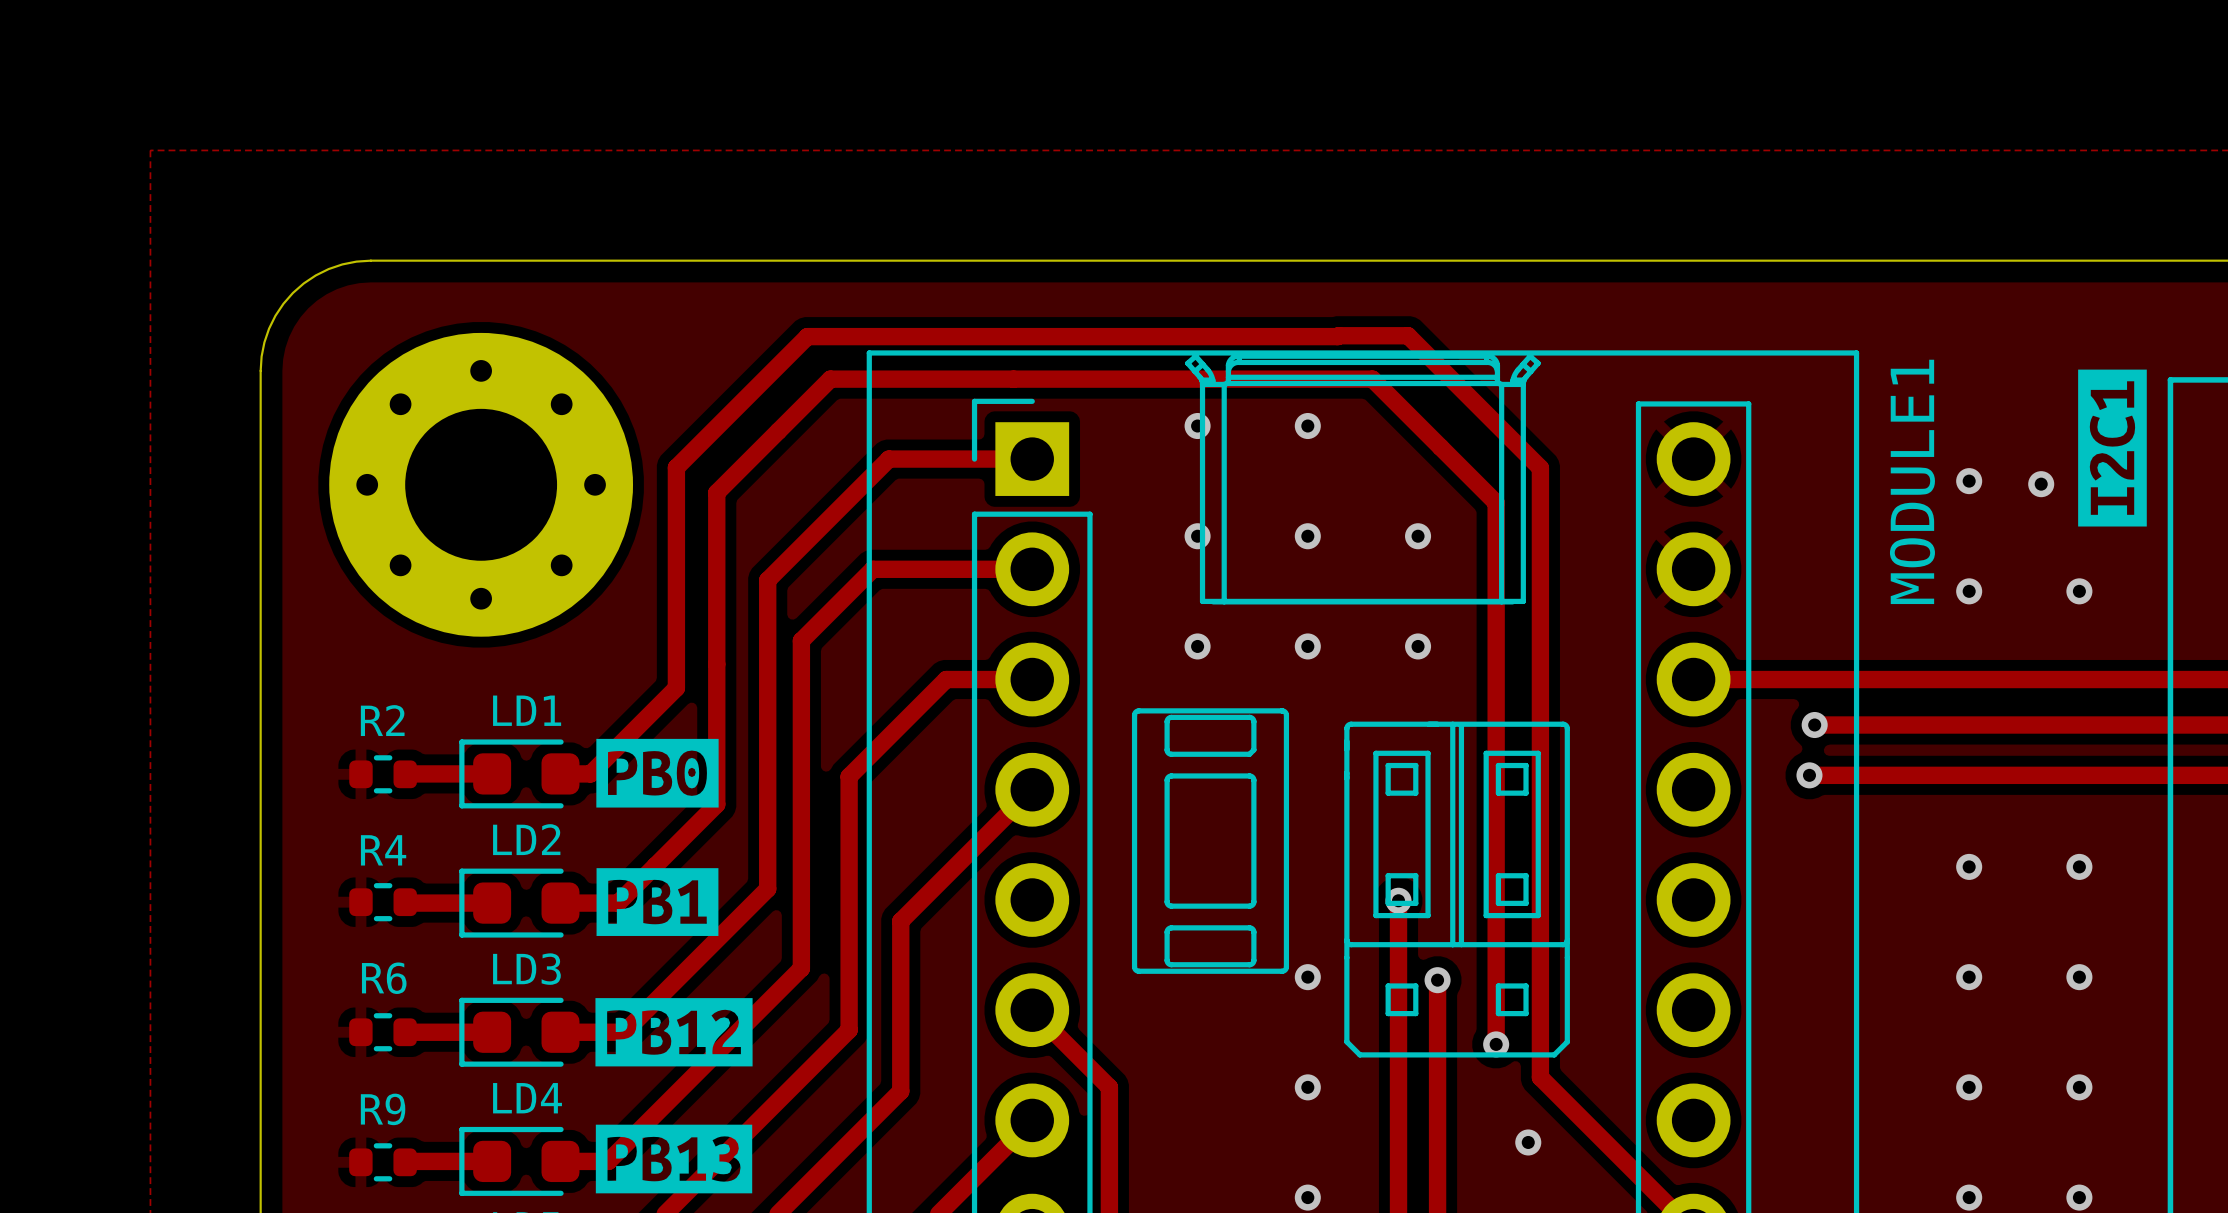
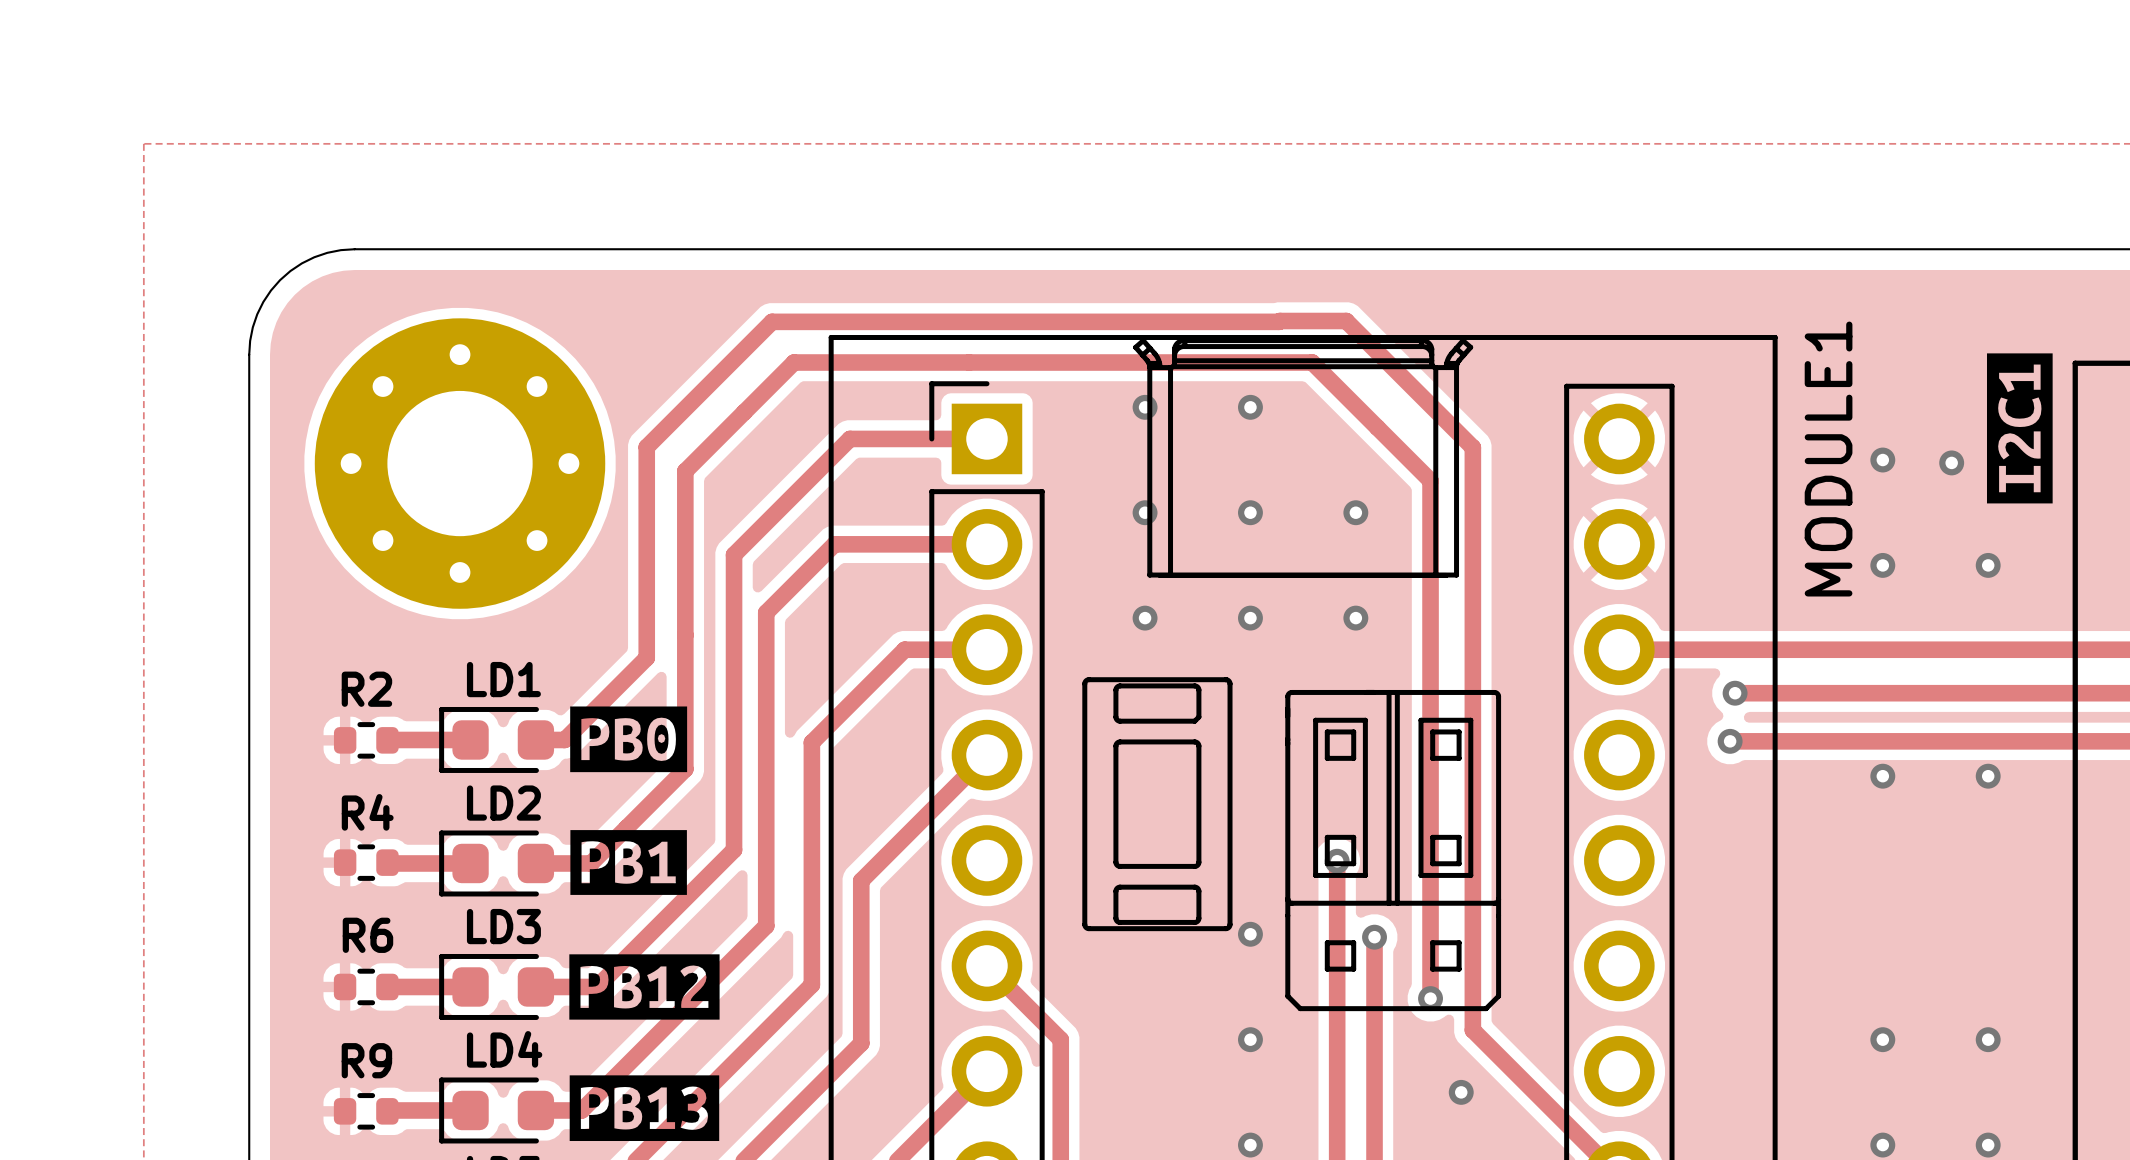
via position: (1969, 866) -> (1882, 776)
via position: (2079, 866) -> (1988, 776)
via: (1969, 977) -> none
via: (2079, 977) -> none

